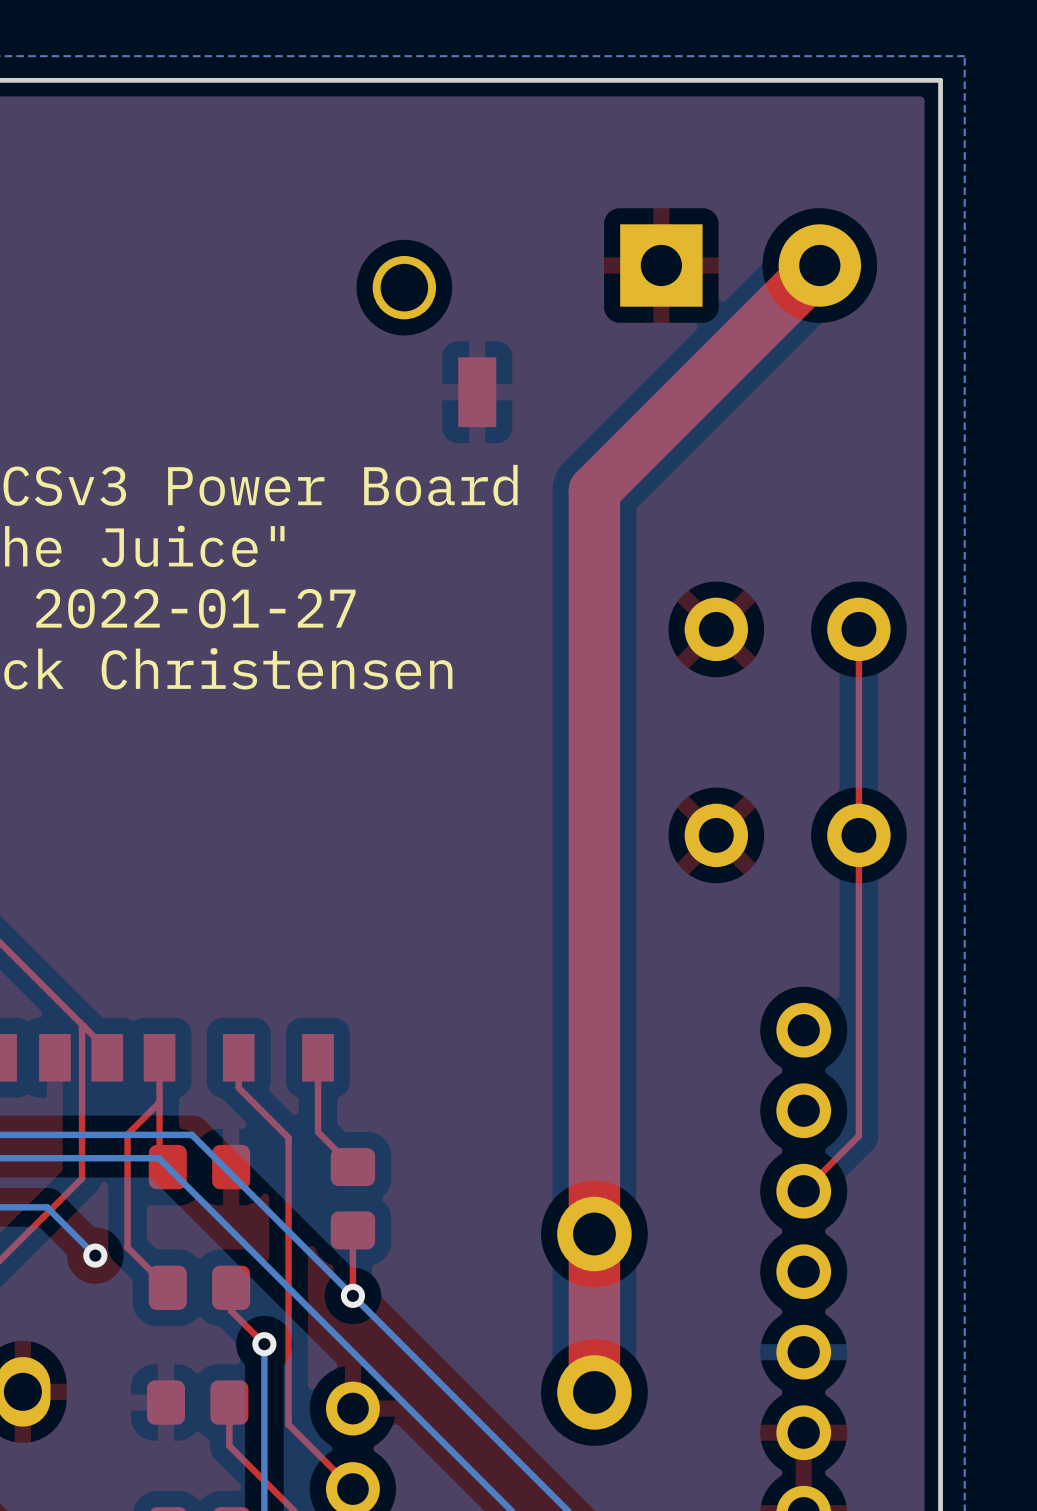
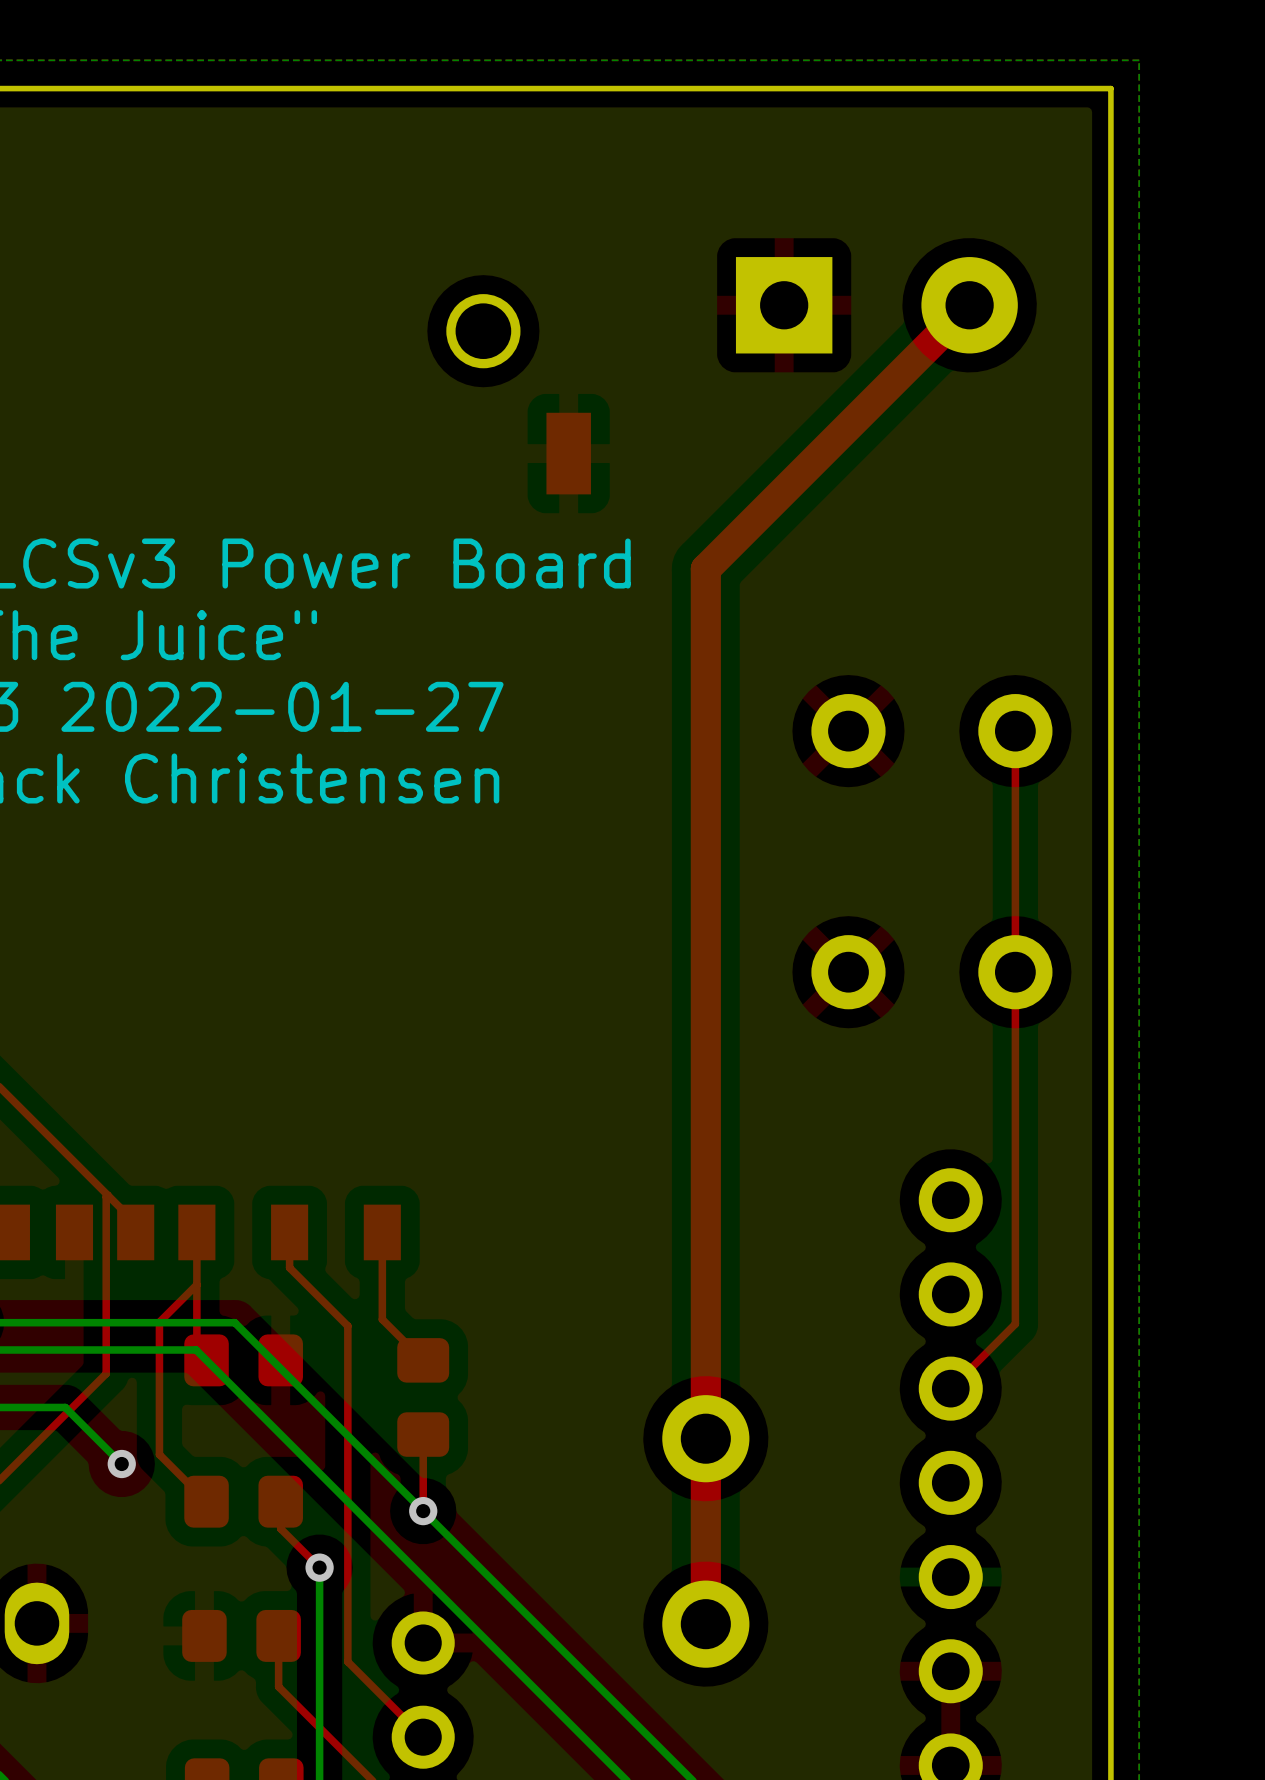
top track width: thick (819, 265) (594, 490) (594, 1392) -> thin (969, 305) (705, 569) (705, 1624)

